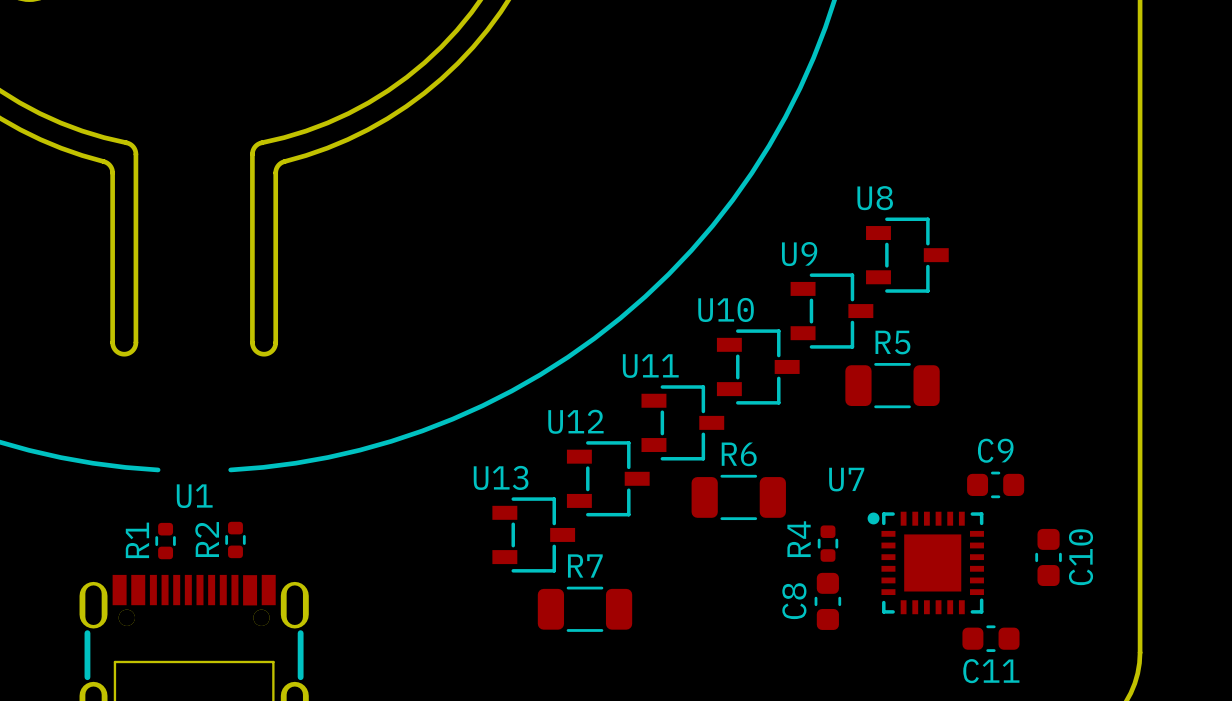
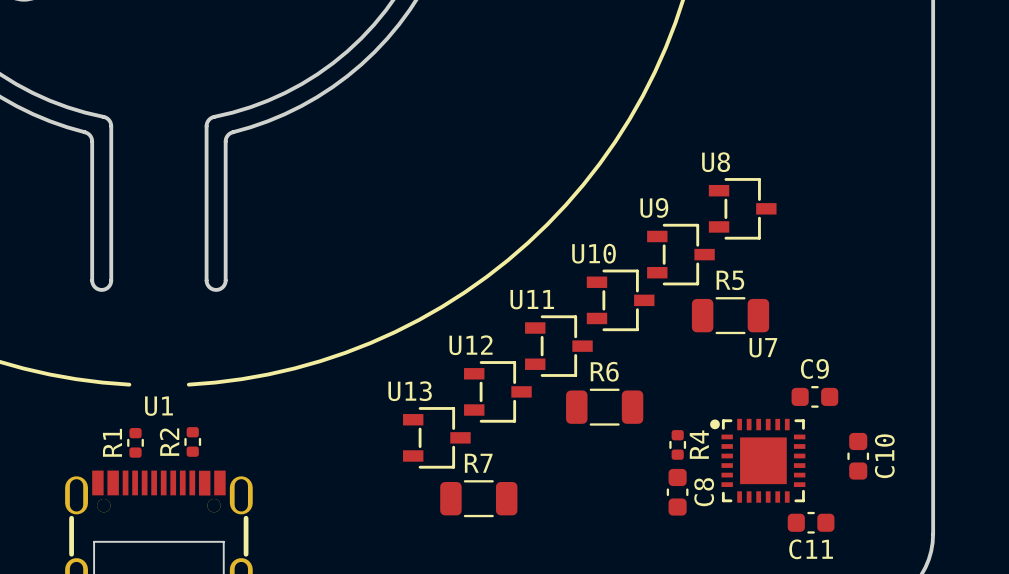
U7 name position: U7 (846, 479) -> U7 (763, 347)
R4 name position: R4 (799, 539) -> R4 (699, 444)
C8 name position: C8 (794, 601) -> C8 (704, 492)

